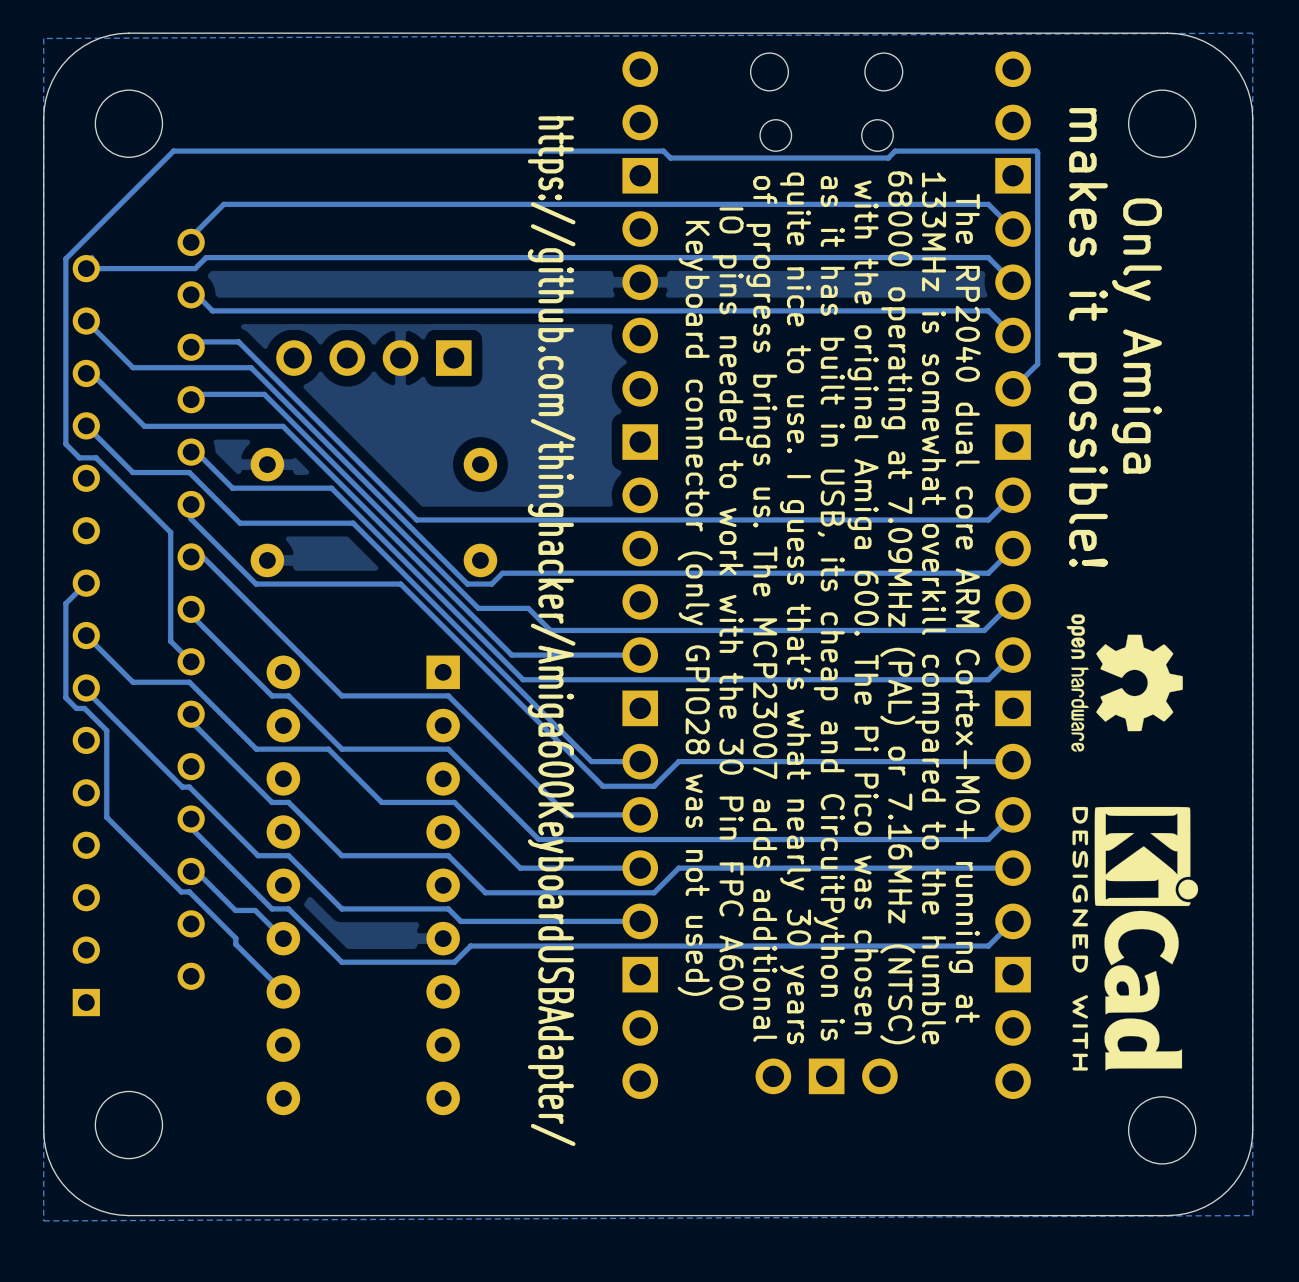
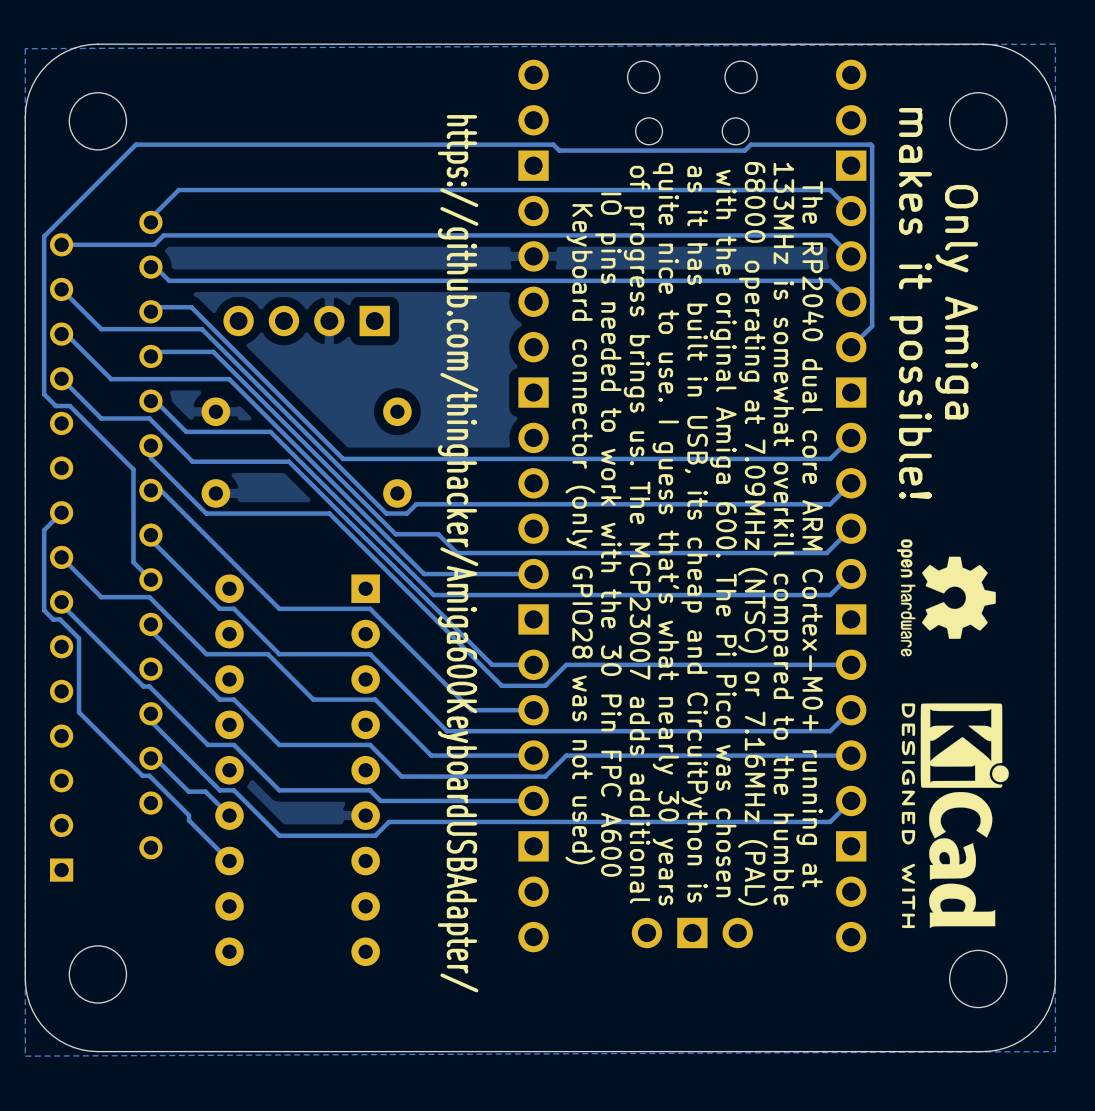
text: 68000 operating at 7.09MHz (PAL) or 7.16MHz (NTSC) (897, 607) -> 68000 operating at 7.09MHz (NTSC) or 7.16MHz (PAL) (752, 533)

